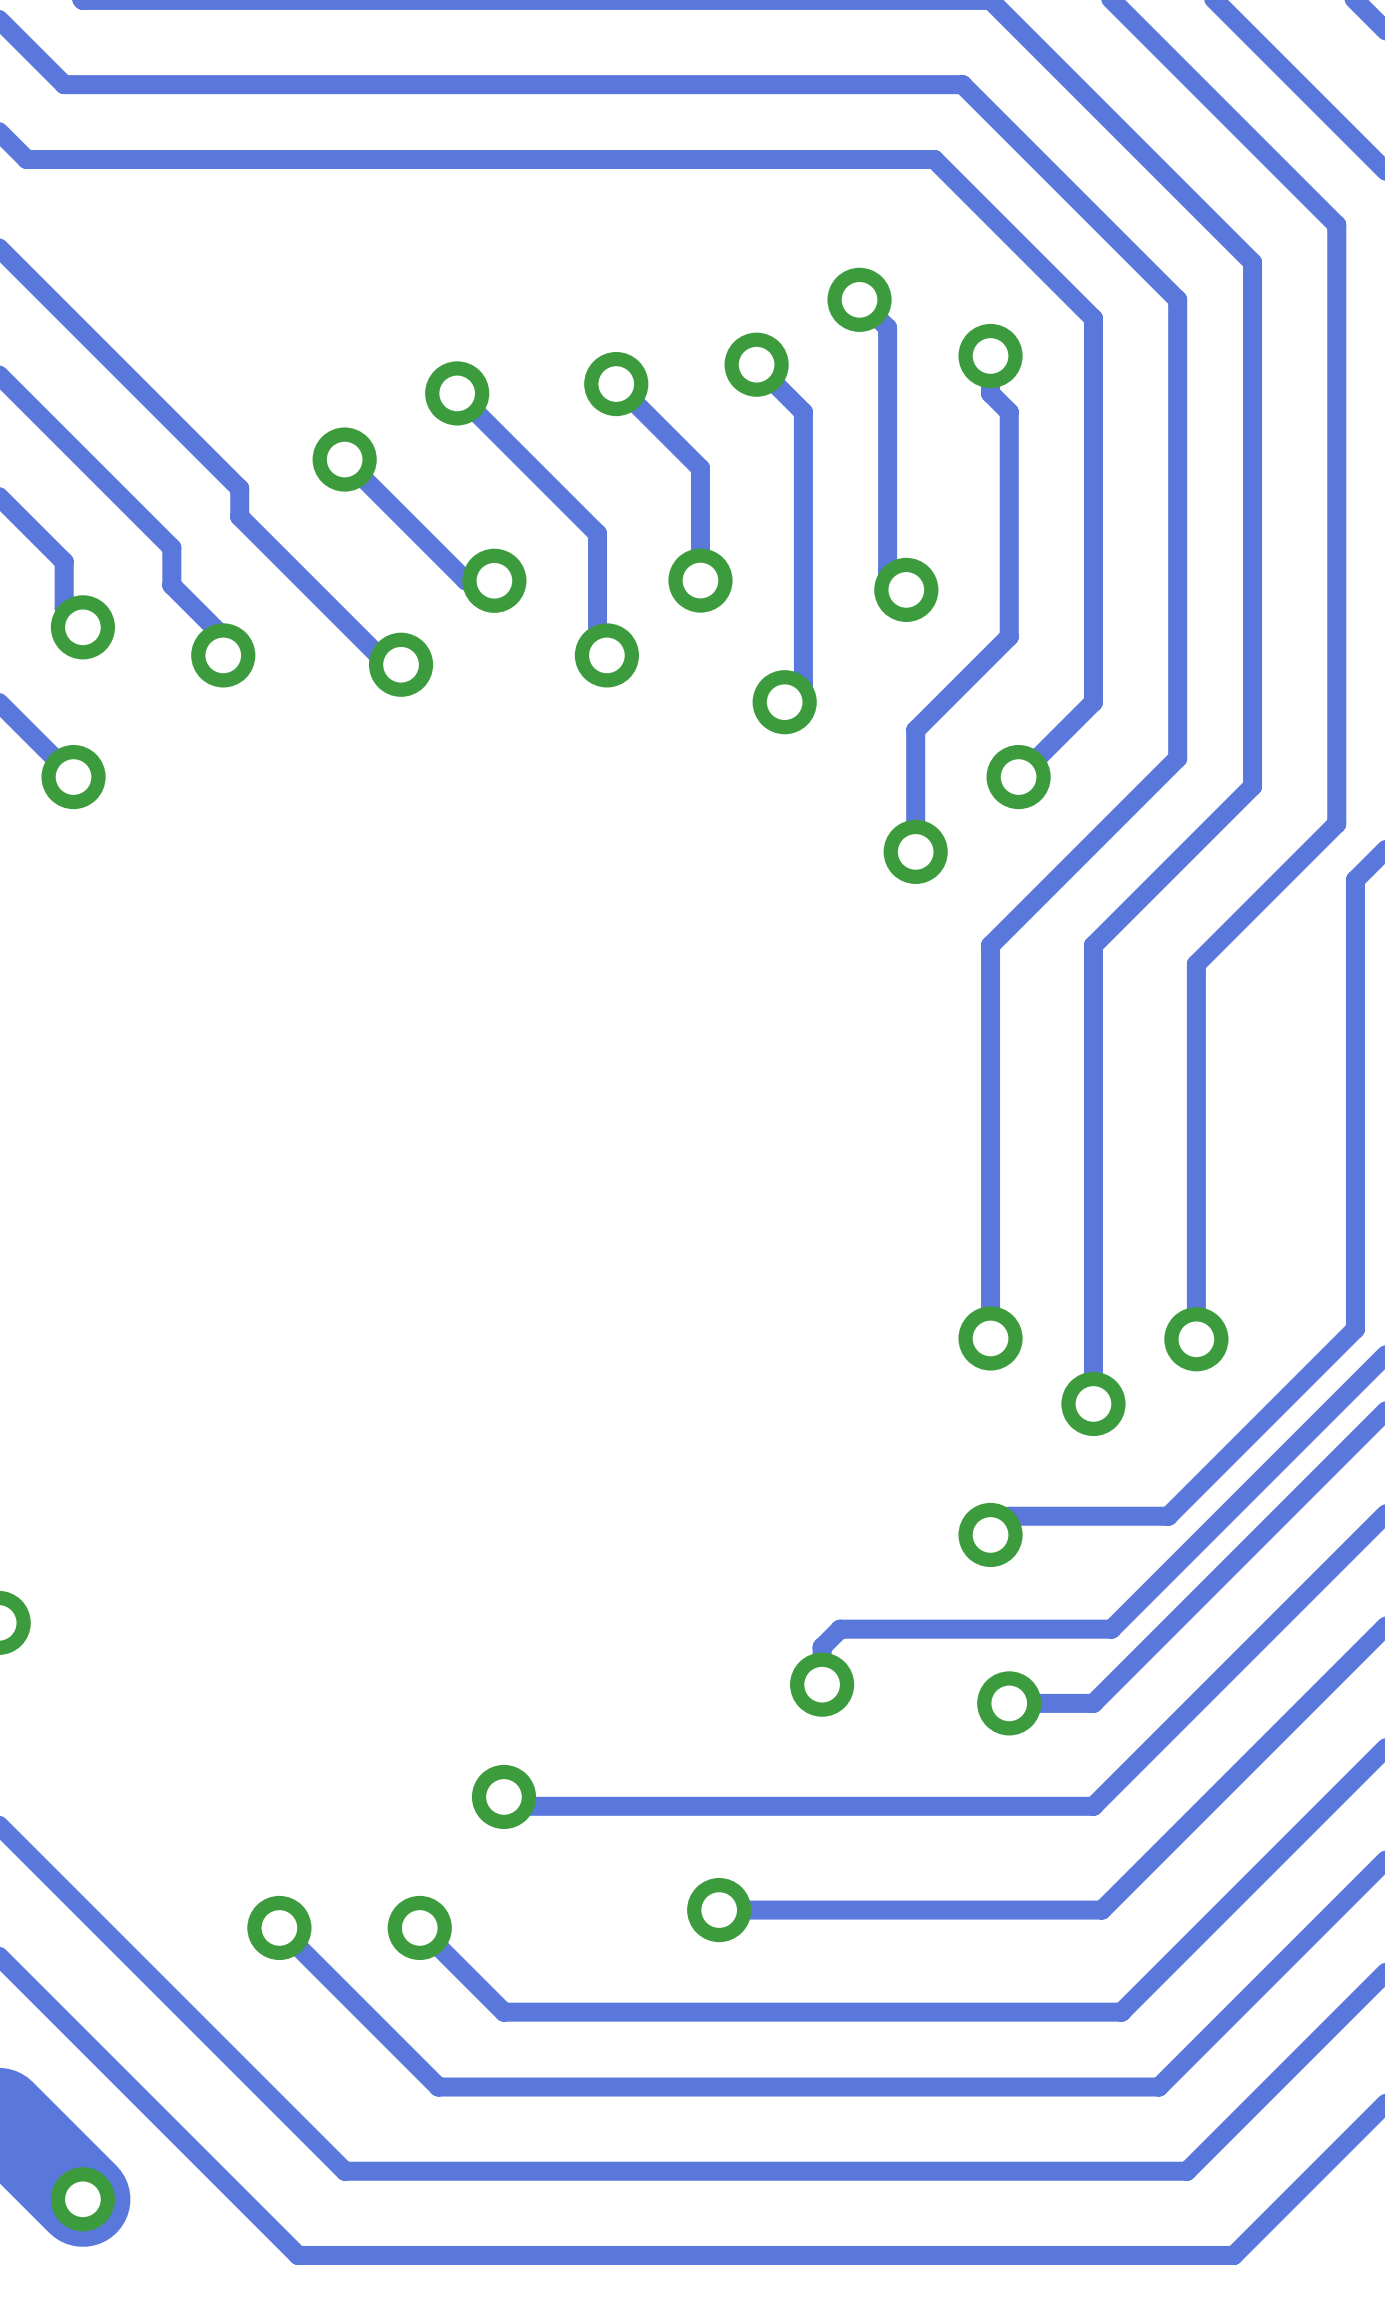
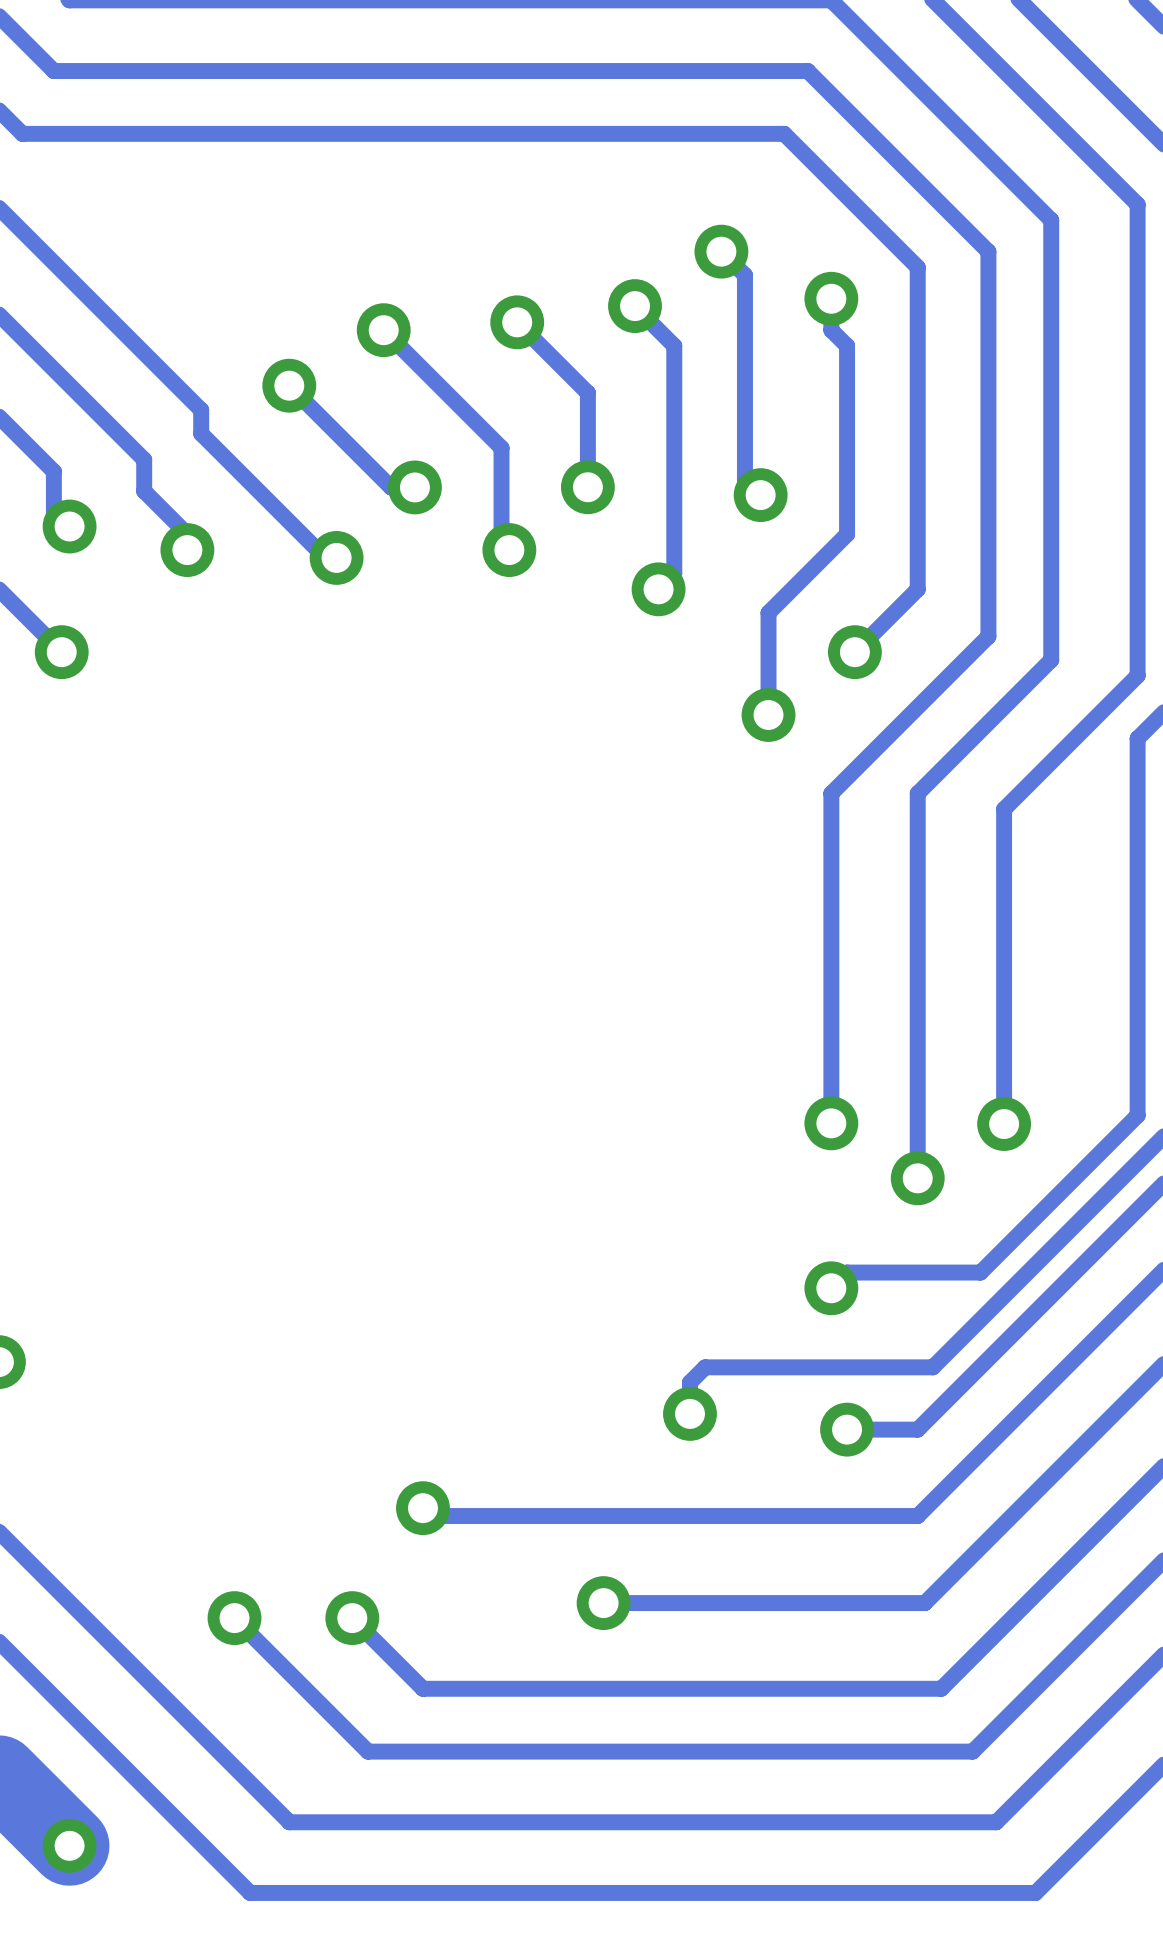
track: (1336, 224) (1336, 823) -> (1121, 188) (1137, 204) (1137, 675) (1121, 691)

